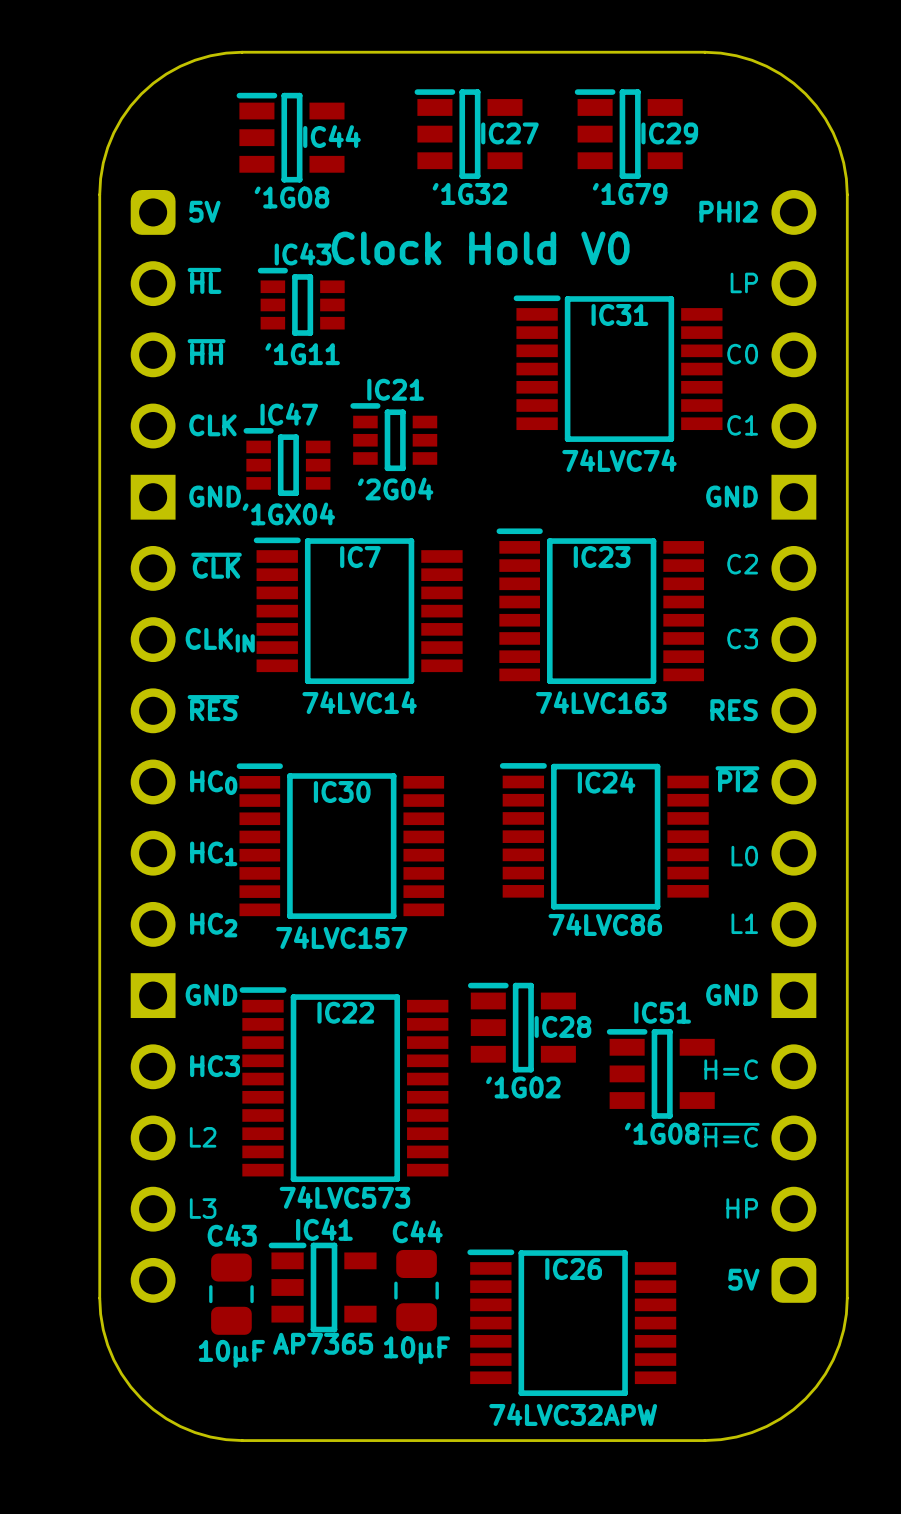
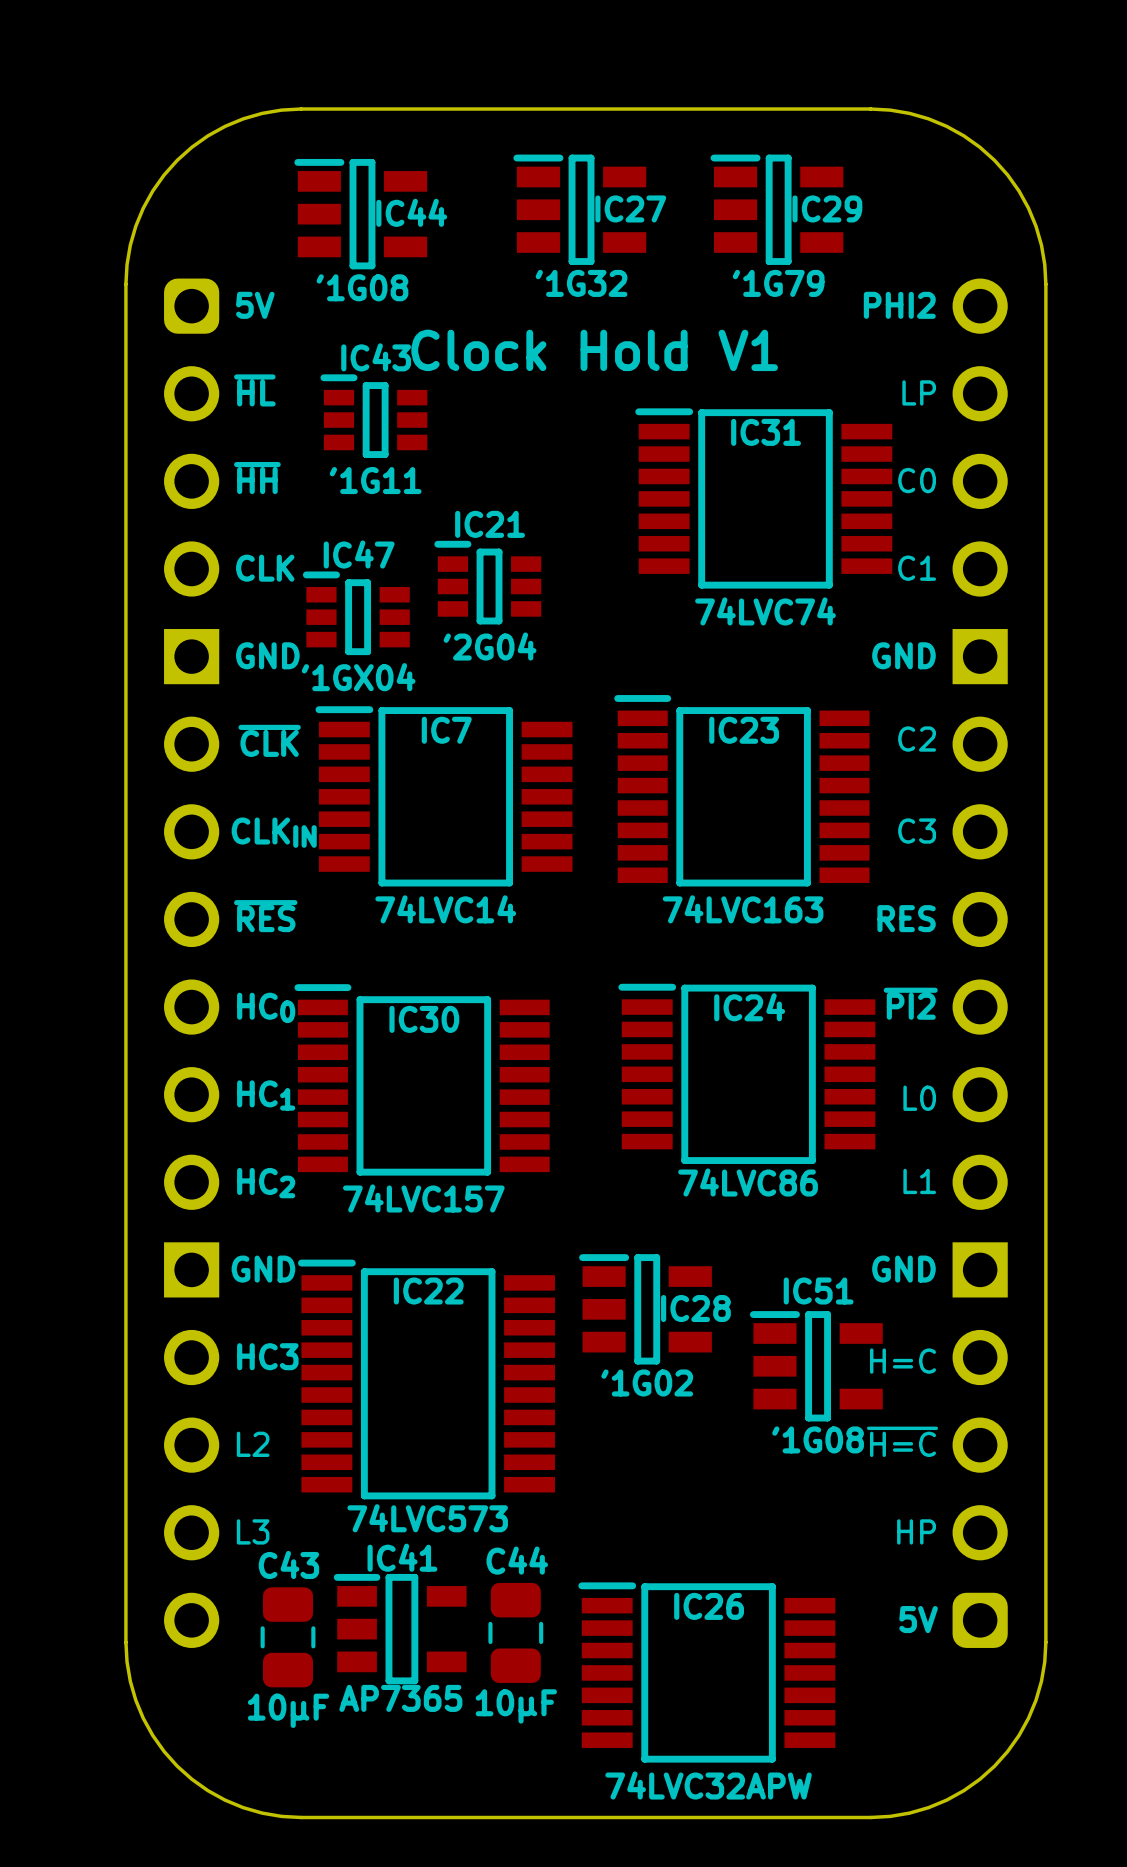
text: Clock Hold V0 (480, 248) -> Clock Hold V1 (594, 350)

